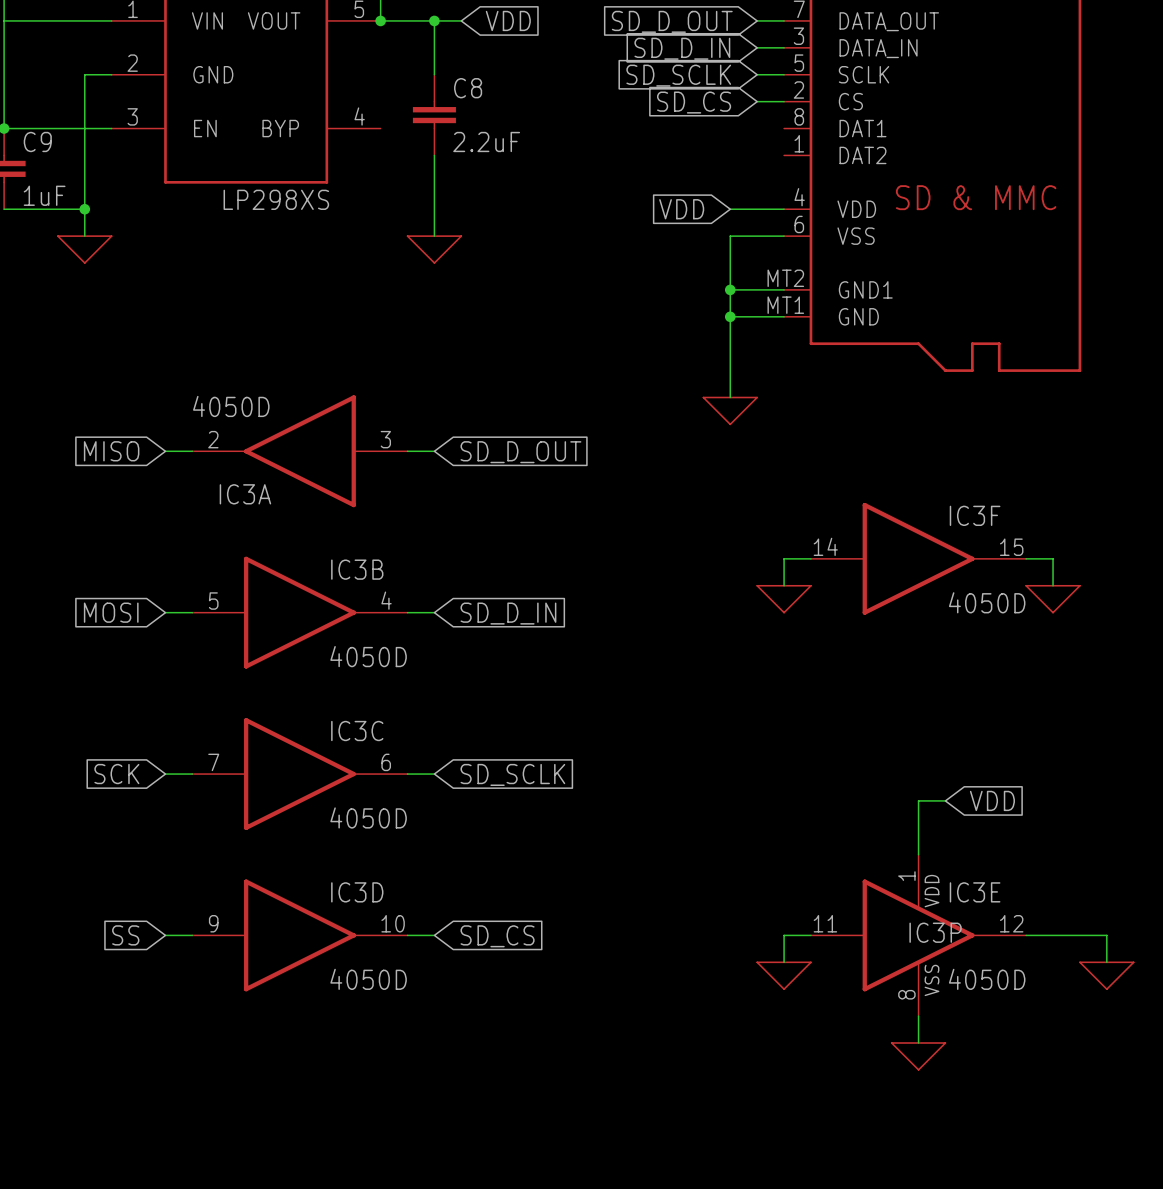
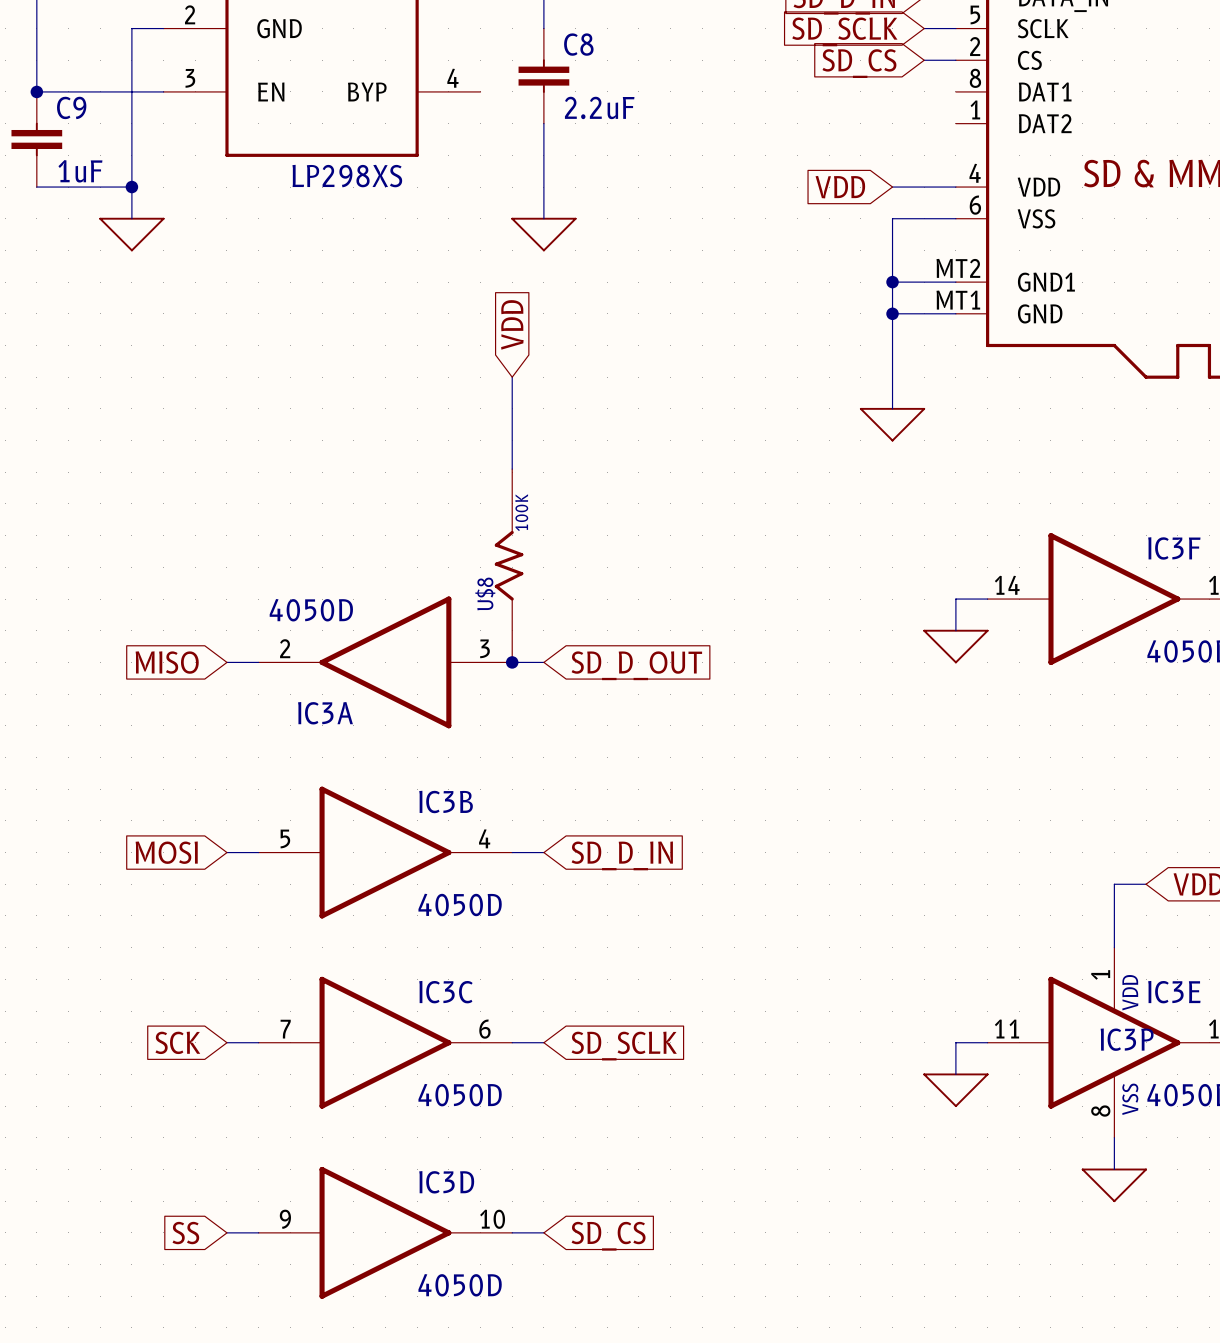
global label: none -> VDD (512, 324)
wire: none -> (512, 377) (512, 469)
global label: MISO (111, 451) -> none
wire: (165, 451) (192, 451) -> none
IC3A position: (299, 451) -> (385, 662)
wire: (407, 451) (434, 451) -> none
global label: SD_D_OUT (520, 452) -> none
U$8: none -> 100K (509, 565)
global label: MOSI (111, 612) -> MISO (167, 662)
IC3B position: (299, 612) -> (385, 852)
junction: none -> (512, 662)
global label: SD_D_IN (508, 613) -> SD_D_OUT (636, 665)
global label: SCK (116, 774) -> MOSI (166, 852)
IC3C position: (299, 774) -> (385, 1042)
global label: SD_SCLK (512, 774) -> SD_D_IN (622, 855)
global label: SS (125, 935) -> SCK (177, 1042)
IC3D position: (299, 935) -> (385, 1232)
global label: SD_CS (497, 936) -> SD_SCLK (624, 1046)
global label: none -> SS (185, 1233)
wire: none -> (226, 1232) (258, 1232)
wire: none -> (512, 1232) (543, 1232)
global label: none -> SD_CS (608, 1236)

